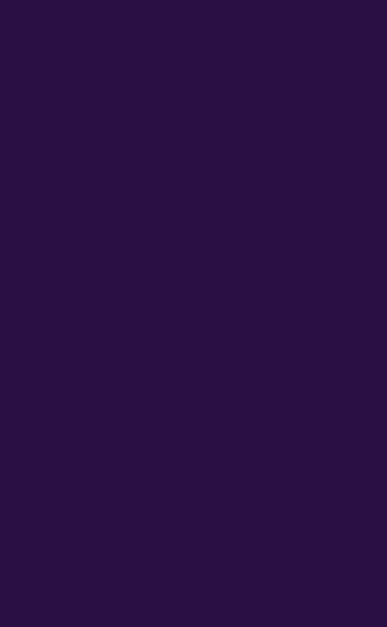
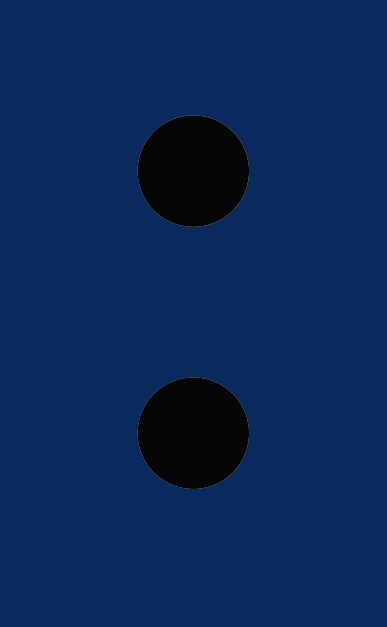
part: none -> (193, 171)
part: none -> (193, 433)

